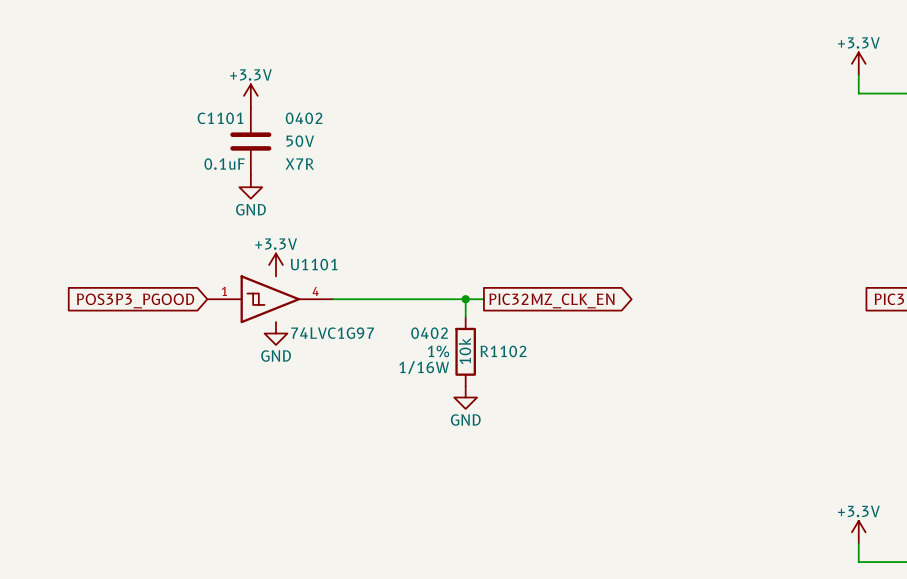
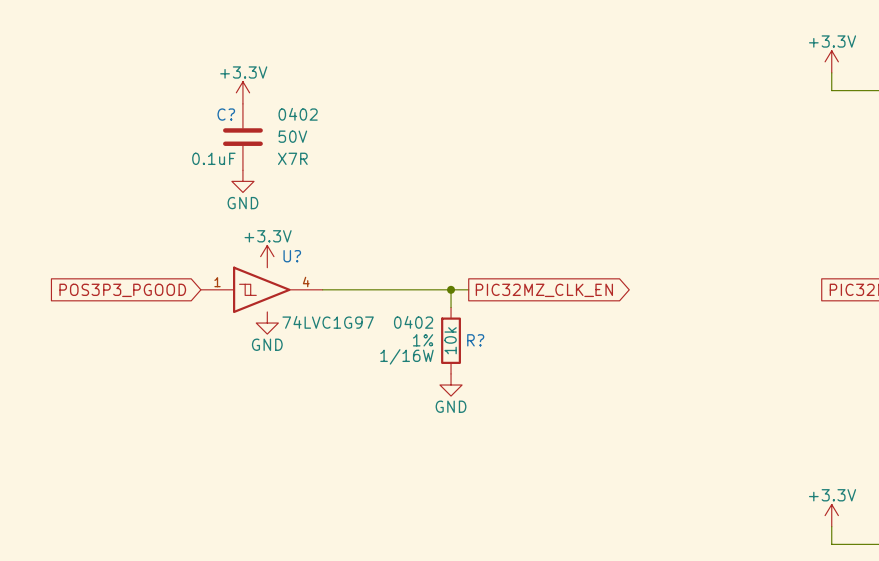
C1101 name: C1101 (220, 118) -> C? (226, 114)
U1101 name: U1101 (314, 264) -> U? (292, 256)
R1102 name: R1102 (503, 351) -> R? (475, 340)

